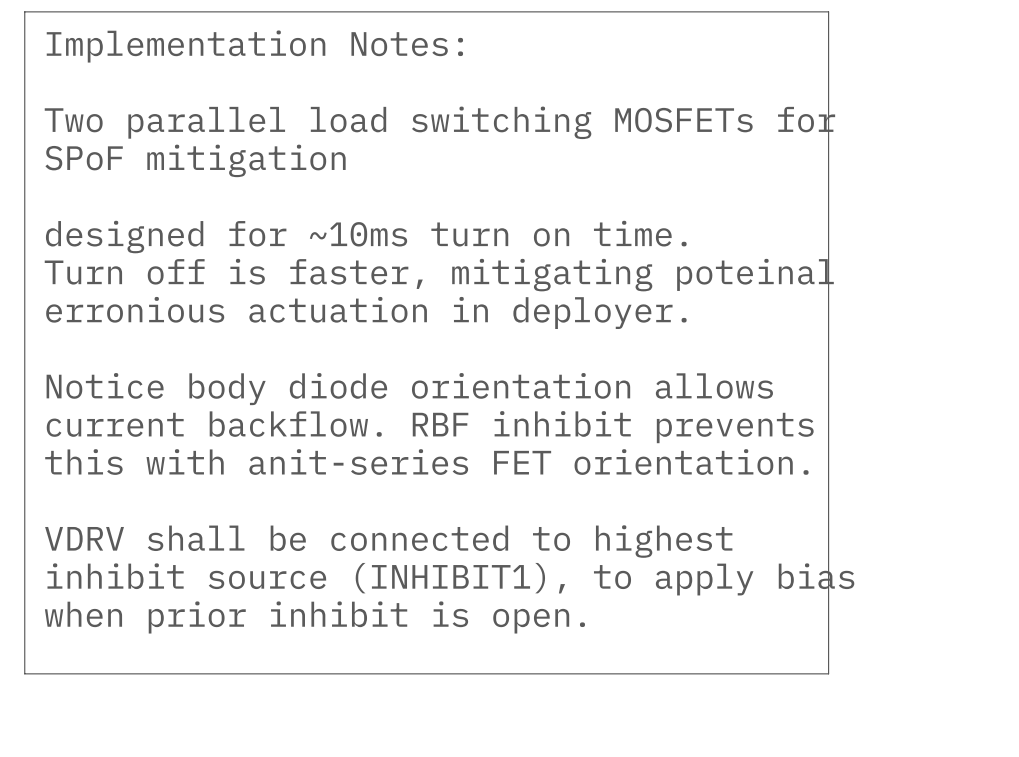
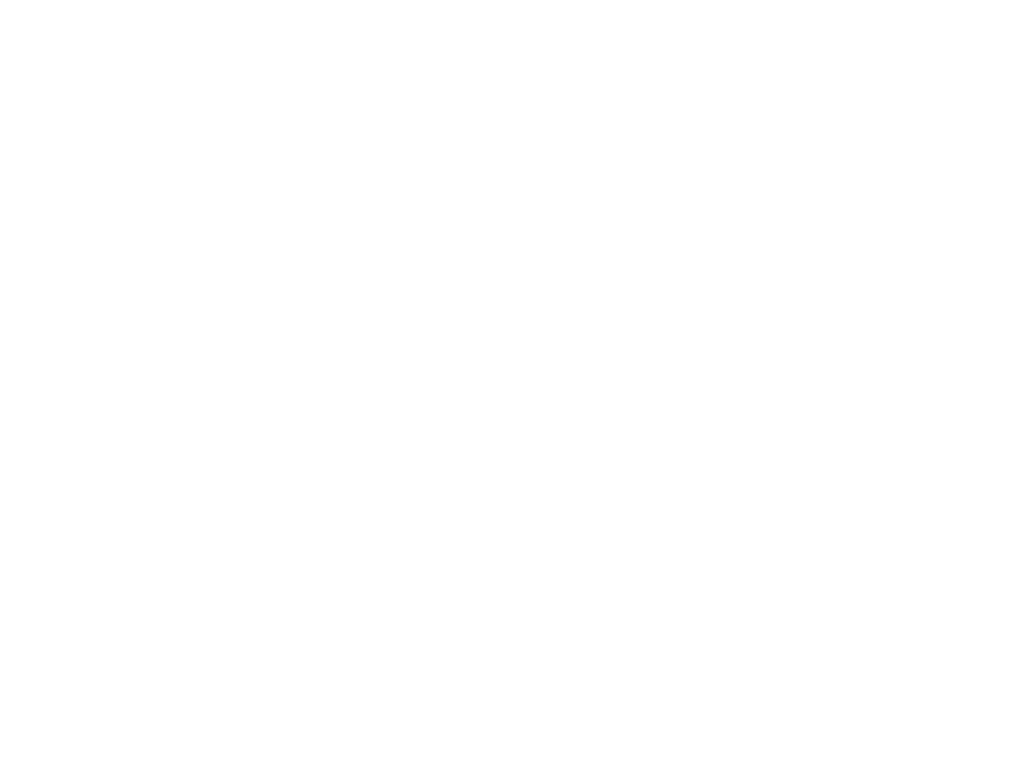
line: (24, 11) (828, 11) (828, 673) (24, 673) (24, 11) -> none
text: Implementation Notes: (254, 46) -> none
text: Two parallel load switching MOSFETs for (439, 122) -> none
text: SPoF mitigation (195, 160) -> none
text: designed for ~10ms turn on time. (366, 237) -> none
text: Turn off is faster, mitigating poteinal (439, 275) -> none
text: erronious actuation in deployer. (366, 312) -> none
text: Notice body diode orientation allows (409, 389) -> none
text: current backflow. RBF inhibit prevents (430, 427) -> none
text: this with anit-series FET orientation. (426, 462) -> none
text: VDRV shall be connected to highest (388, 541) -> none
text: inhibit source (INHIBIT1), to apply bias (450, 579) -> none
text: when prior inhibit is open. (314, 617) -> none

